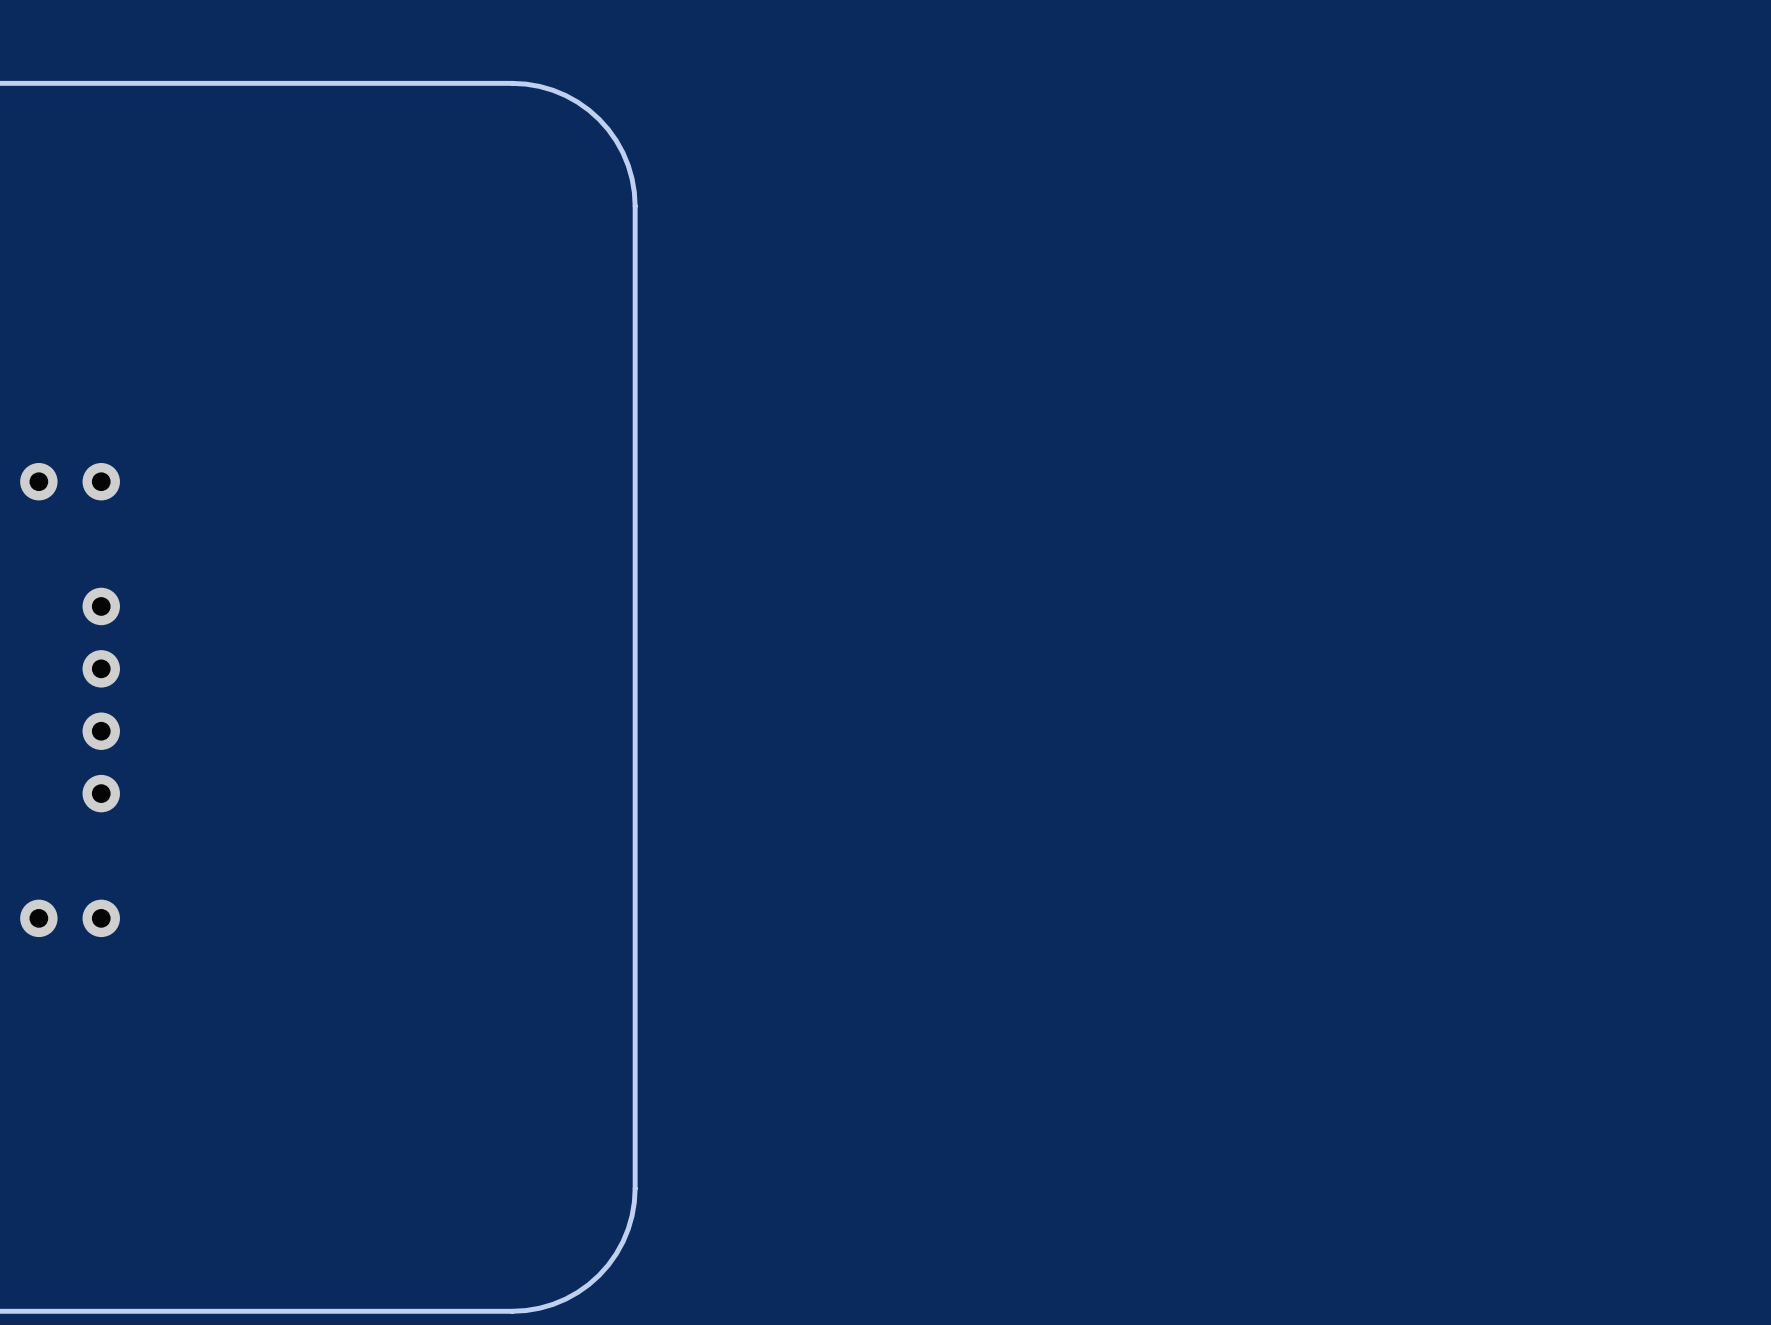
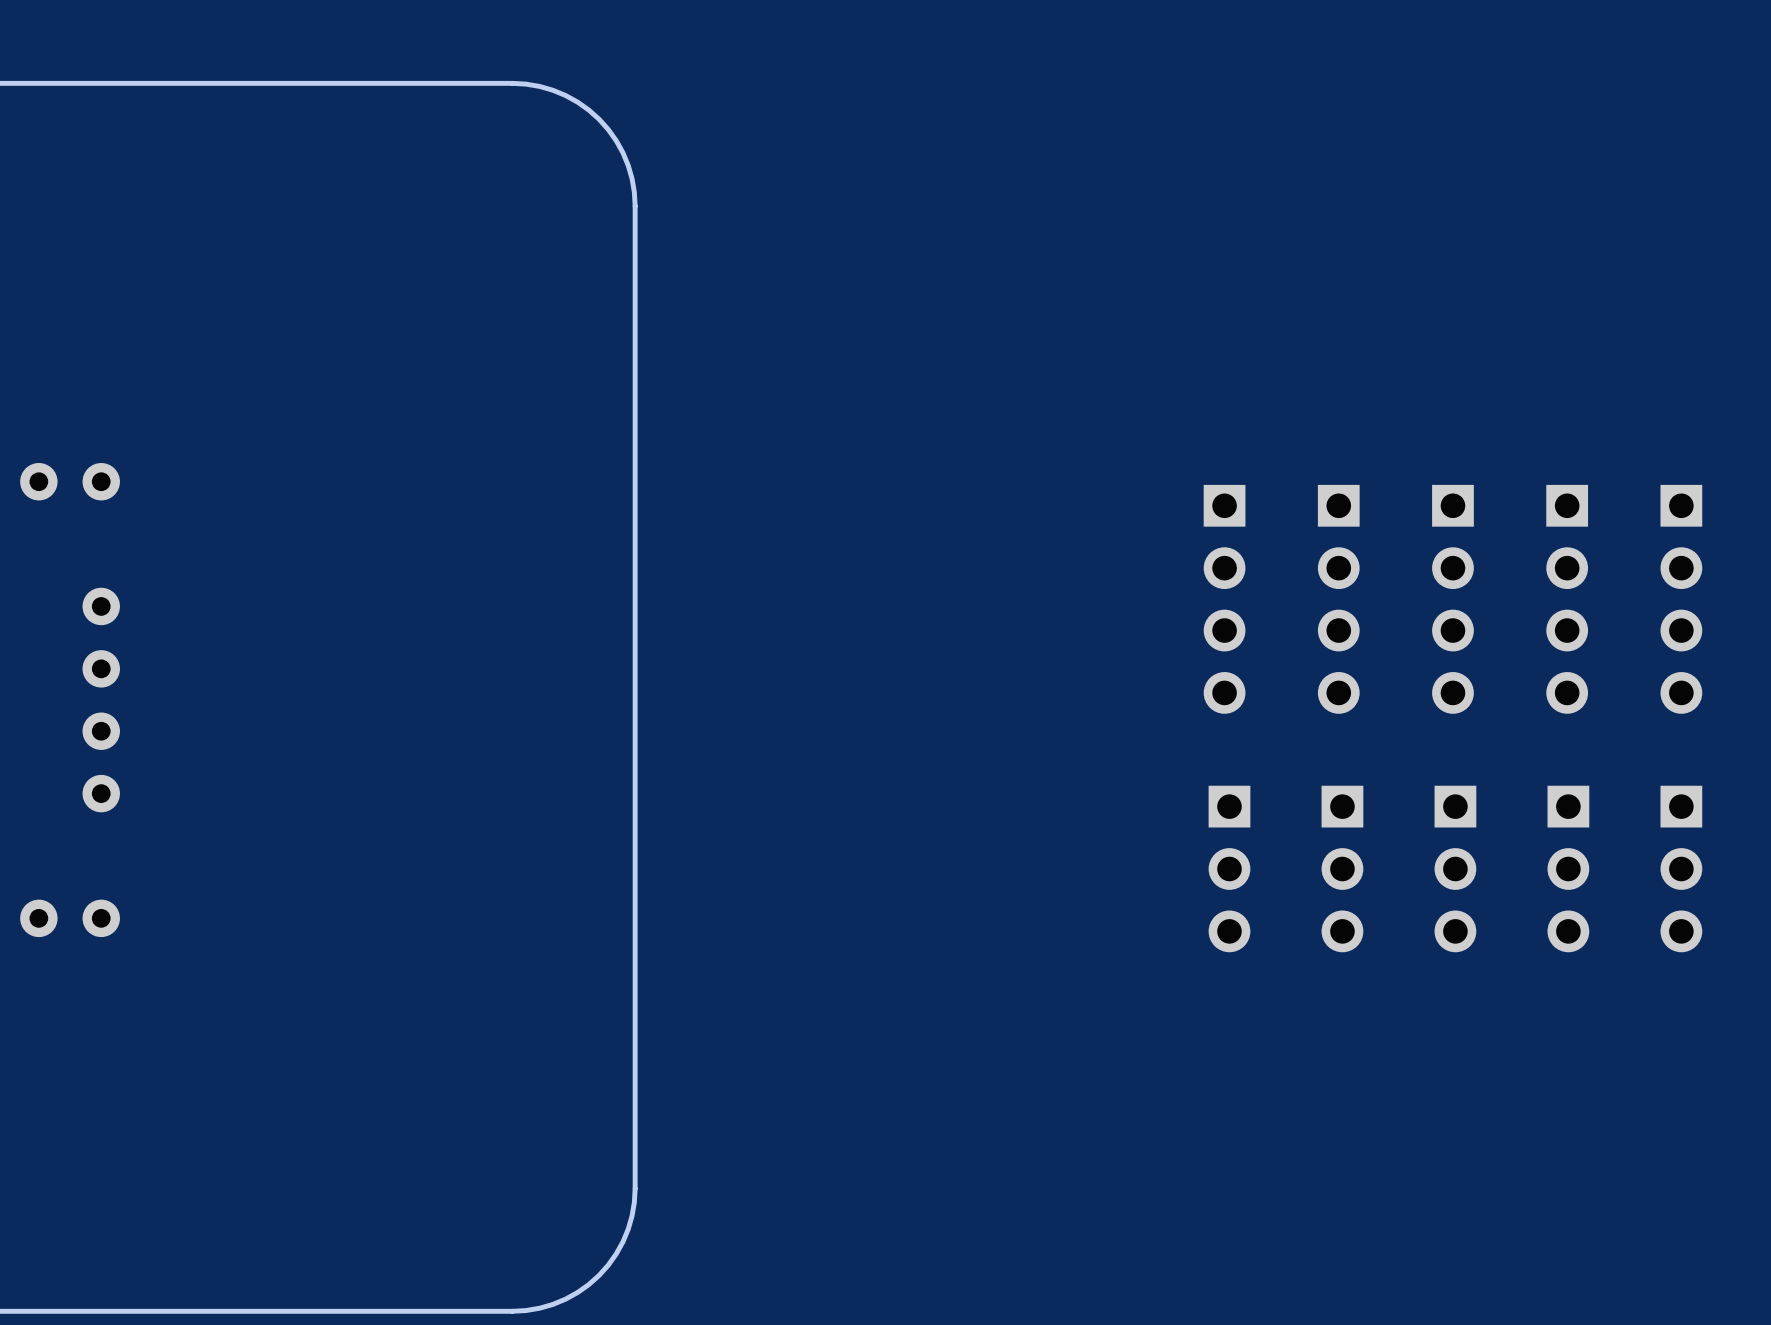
part: none -> (1224, 599)
part: none -> (1338, 599)
part: none -> (1452, 599)
part: none -> (1567, 599)
part: none -> (1681, 599)
part: none -> (1229, 869)
part: none -> (1342, 869)
part: none -> (1455, 869)
part: none -> (1568, 869)
part: none -> (1681, 869)

